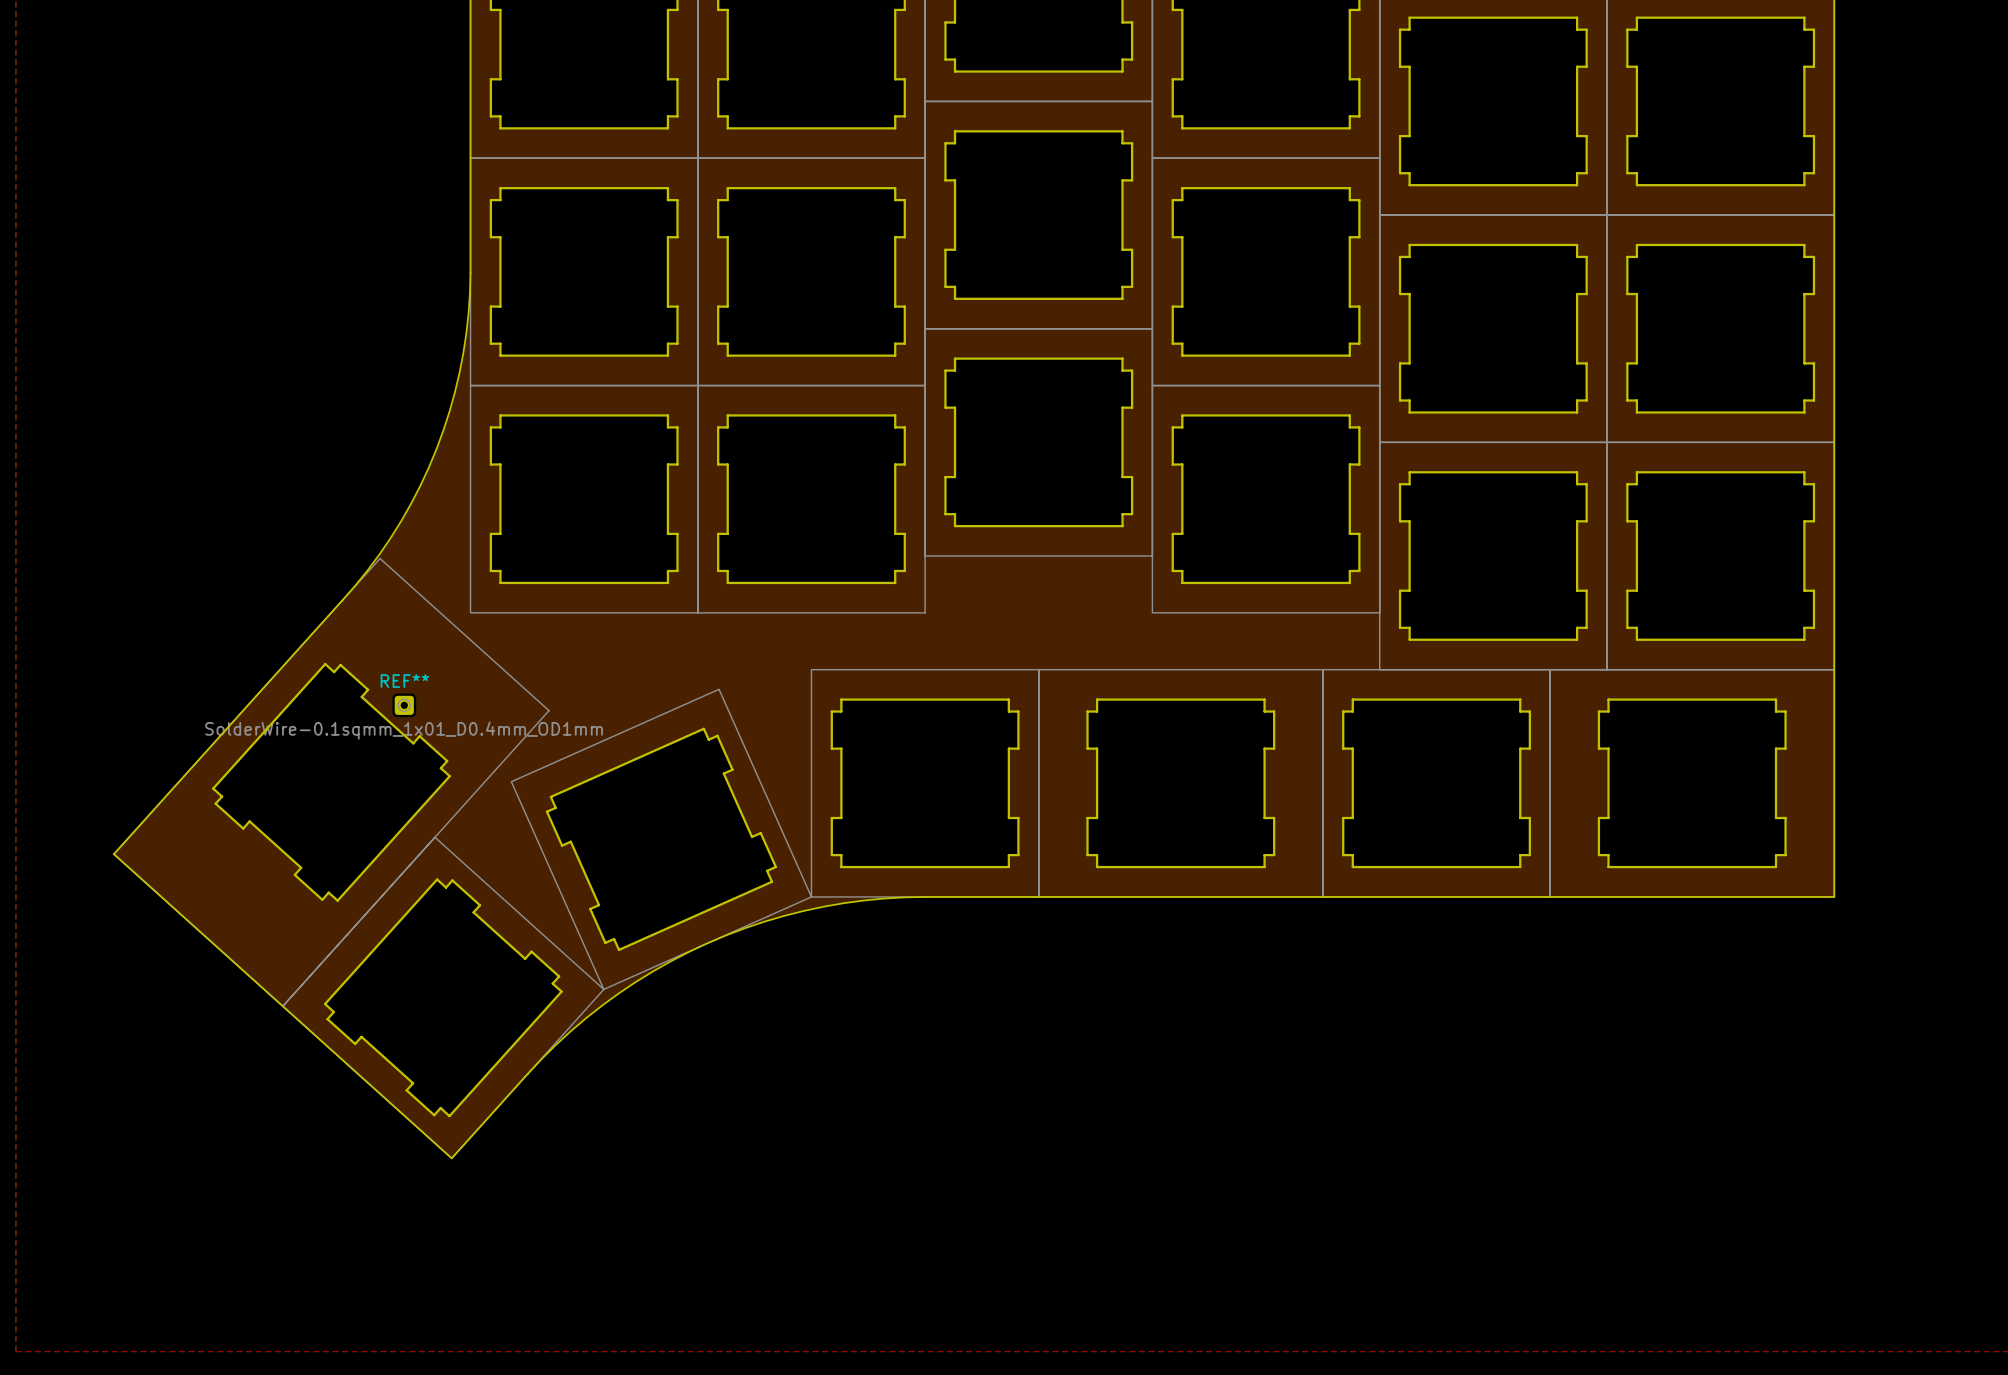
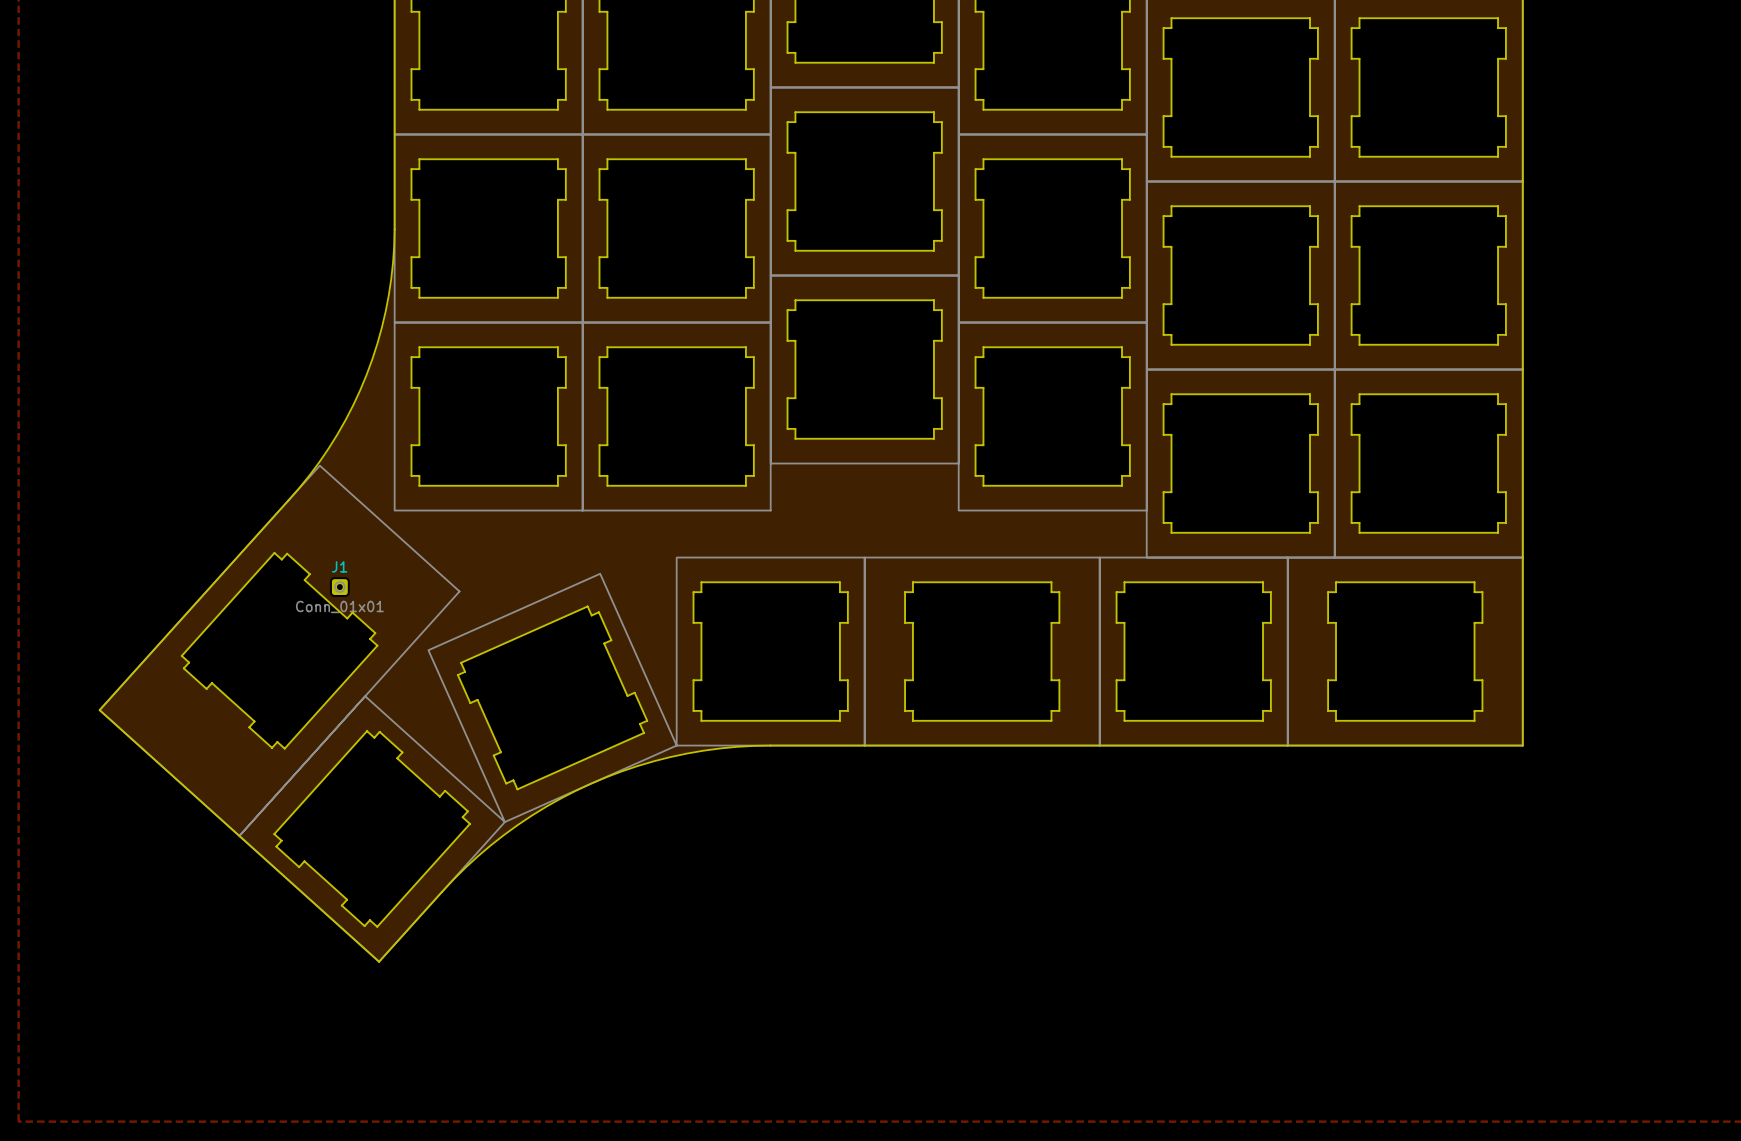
REF** name: REF** (404, 681) -> J1 (339, 566)
REF** value: SolderWire-0.1sqmm_1x01_D0.4mm_OD1mm (404, 730) -> Conn_01x01 (339, 606)

